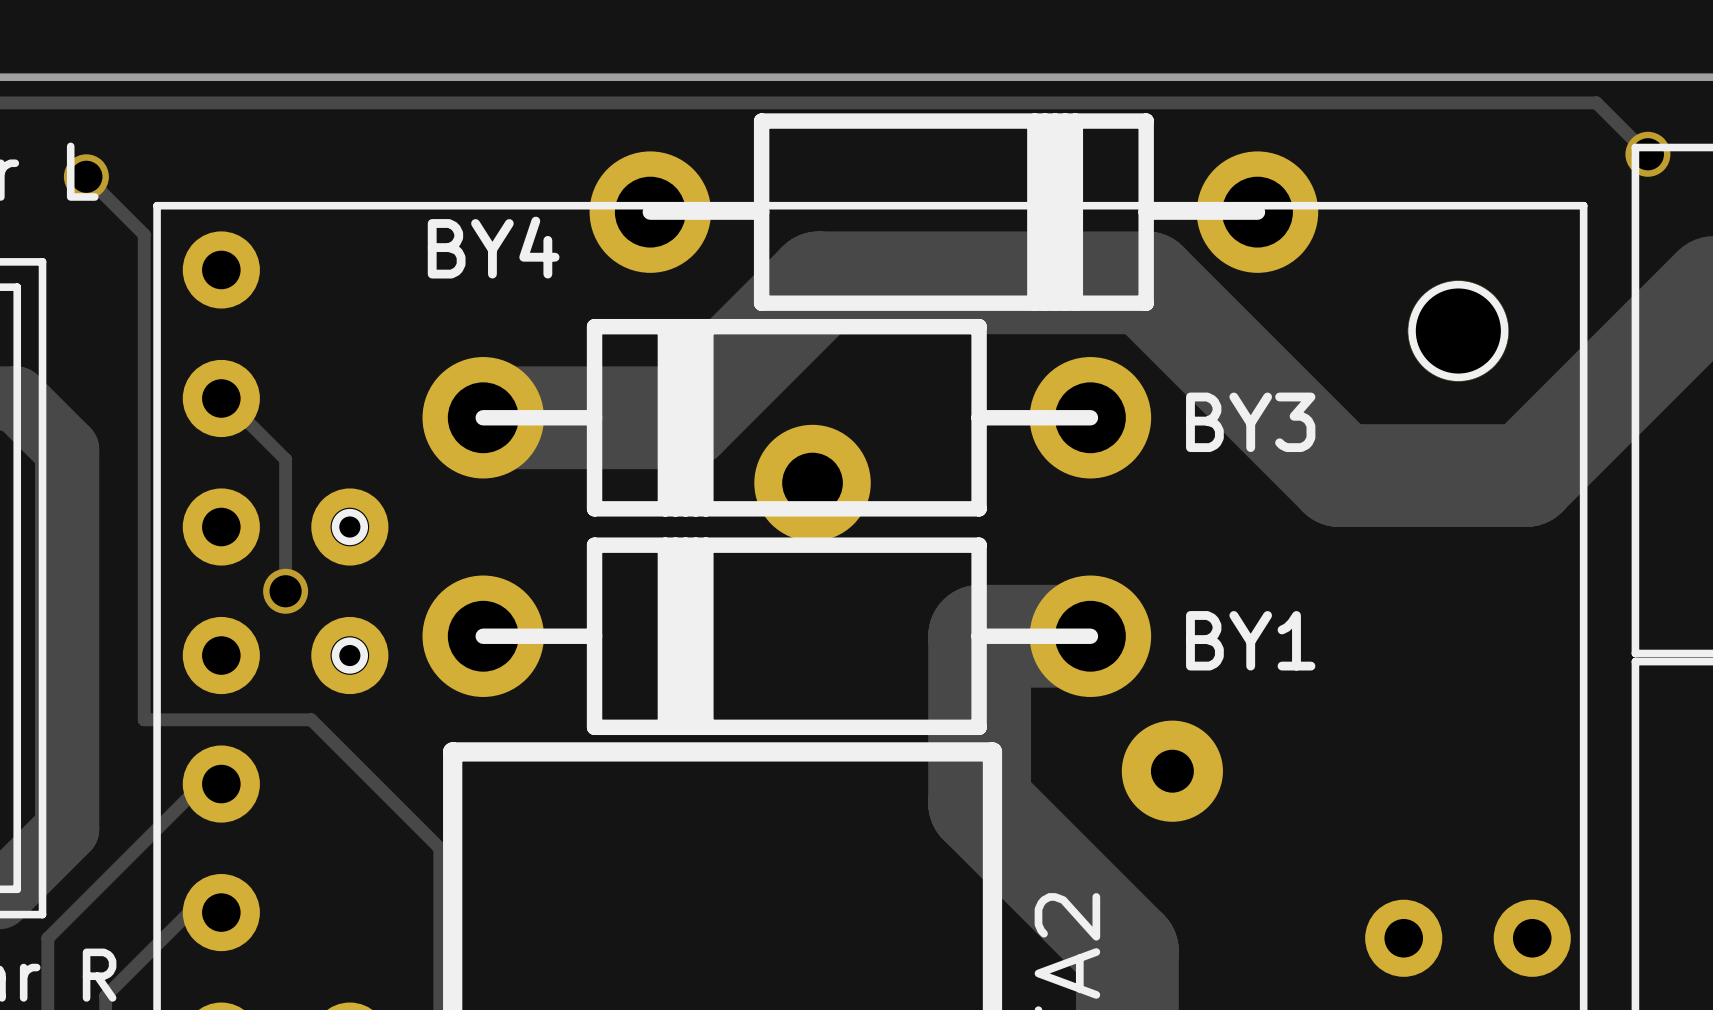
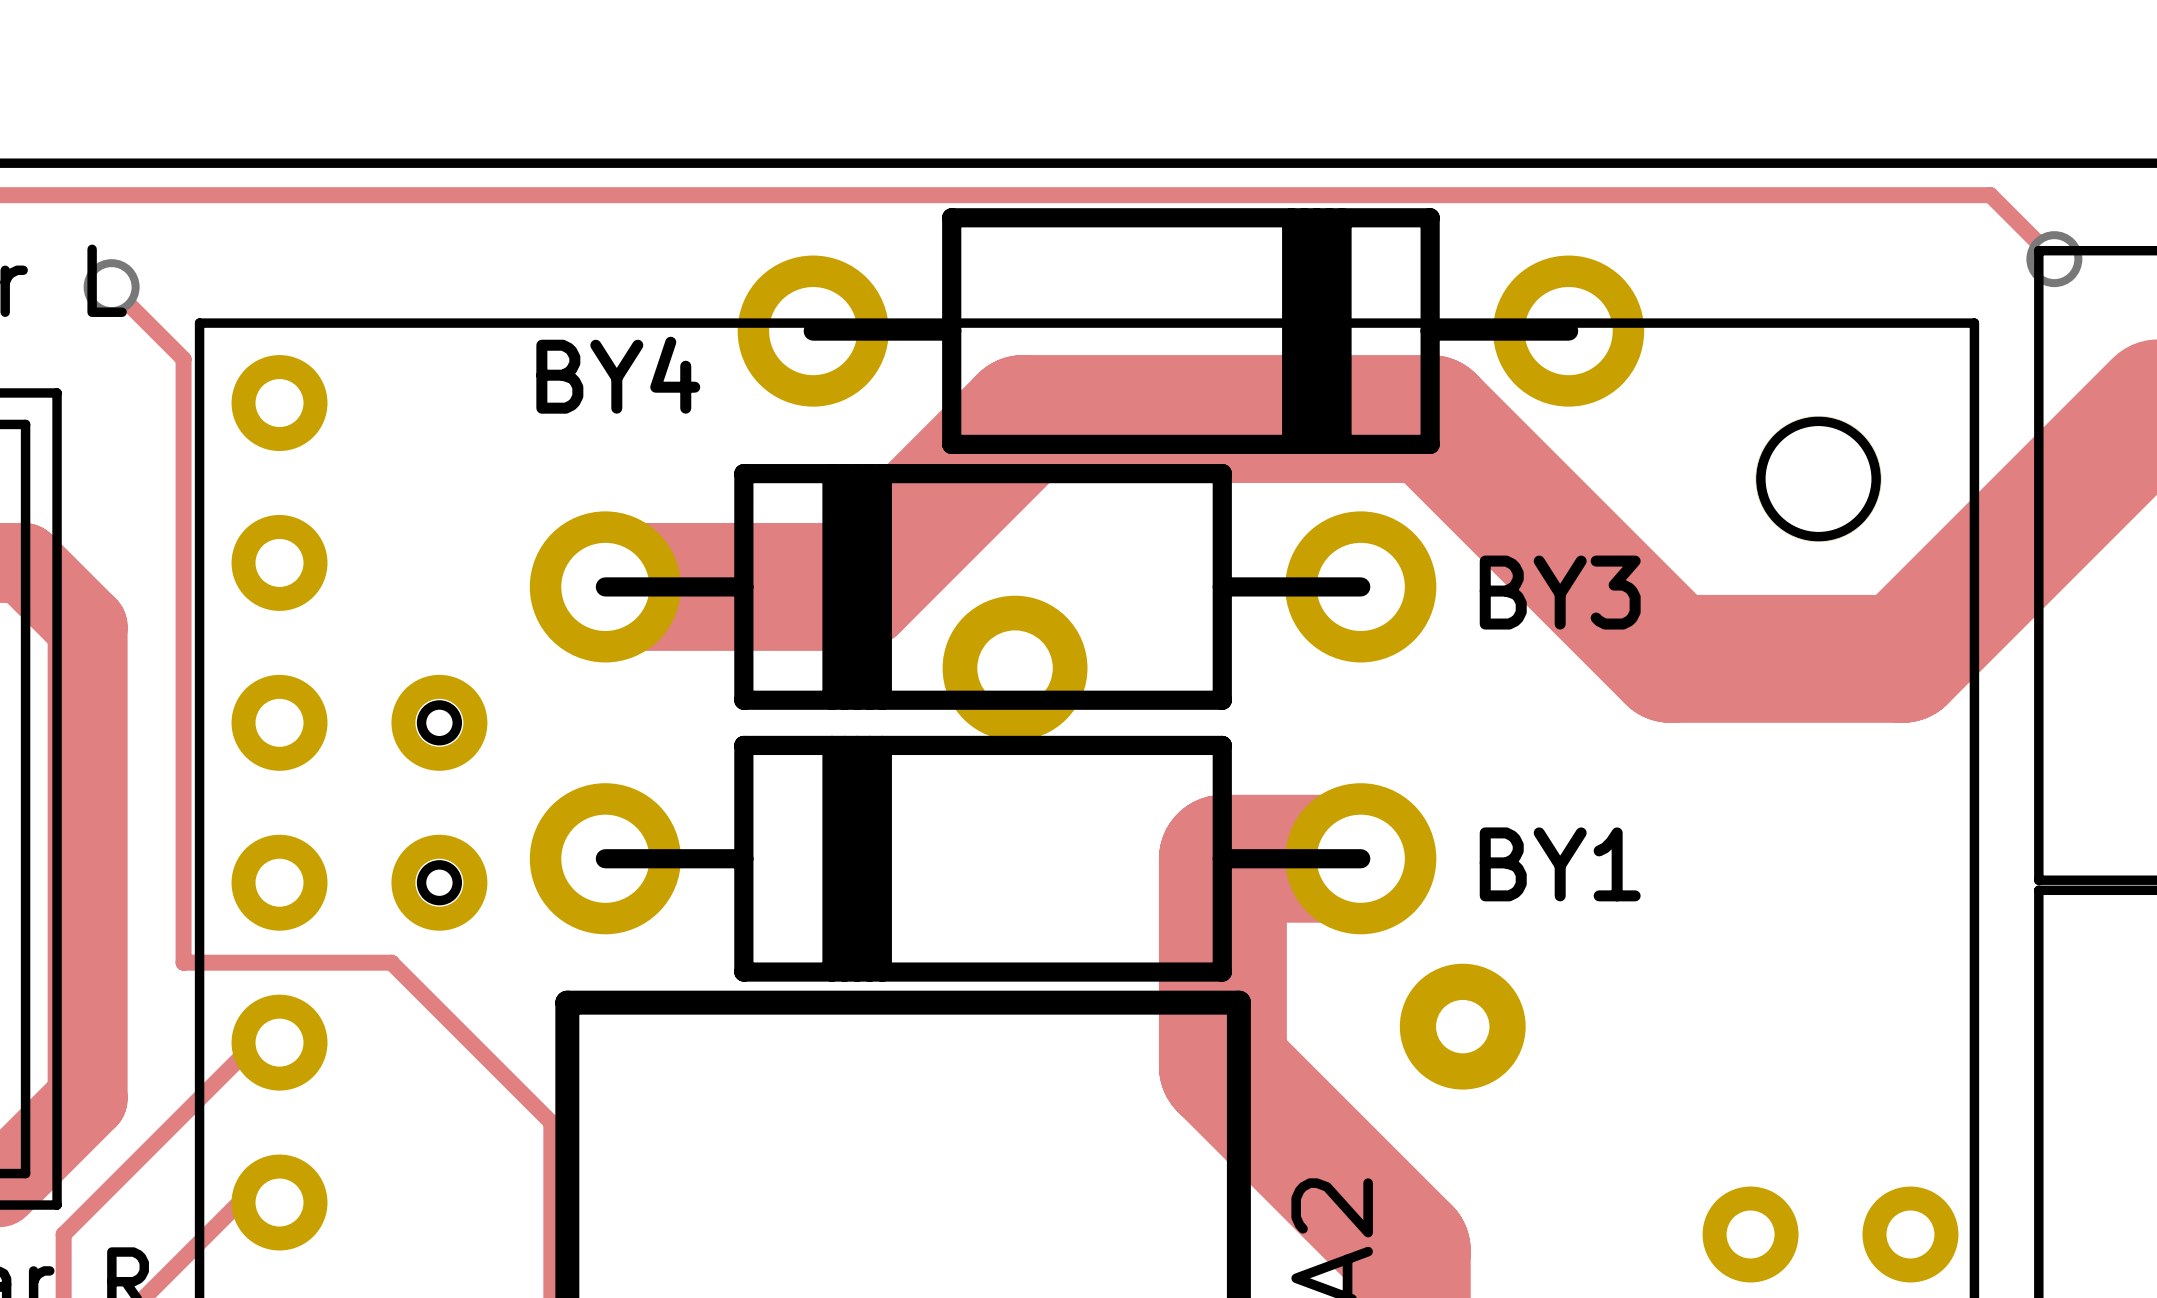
track: (221, 398) (224, 398) (285, 459) (285, 591) -> none
via: (285, 591) -> none

